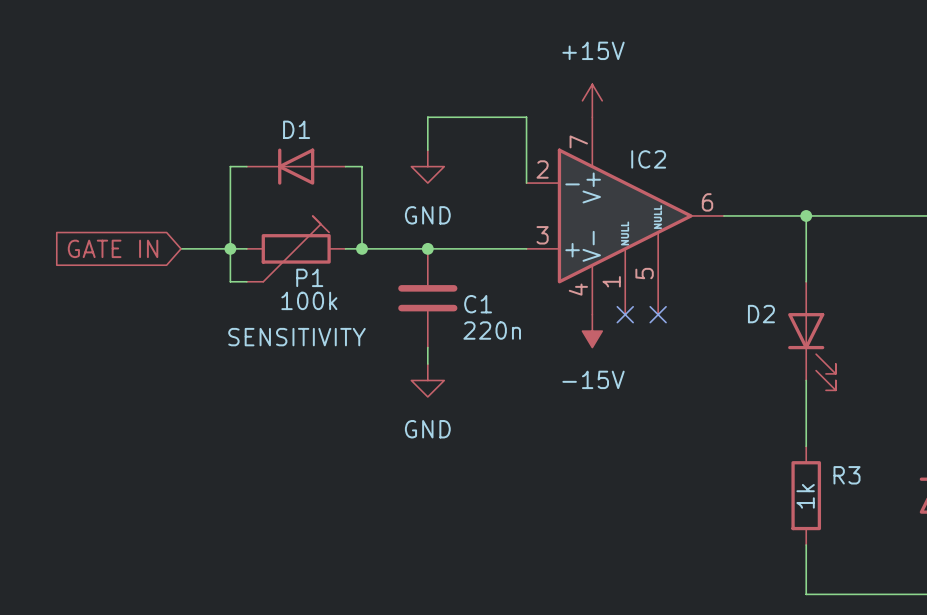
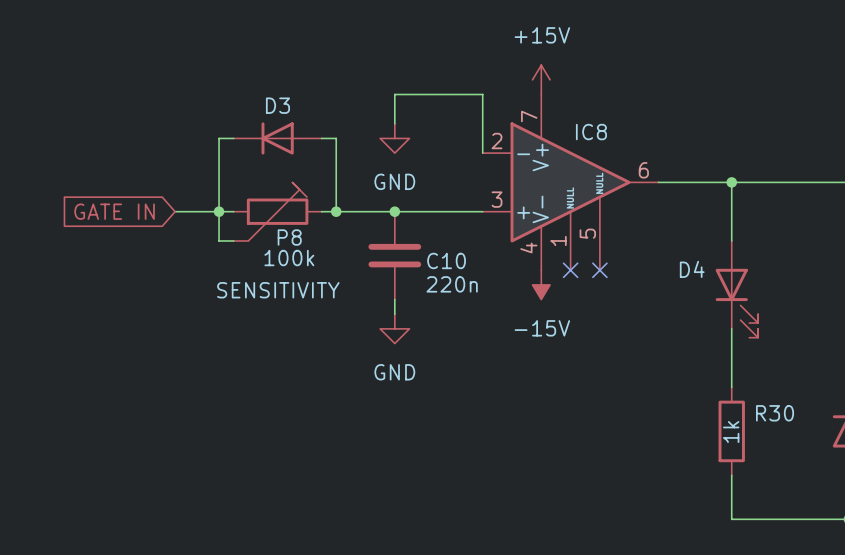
D1 name: D1 (296, 129) -> D3 (277, 105)
IC2 name: IC2 (648, 159) -> IC8 (591, 132)
P1 name: P1 (309, 277) -> P8 (289, 237)
C1 name: C1 (478, 304) -> C10 (446, 260)
D2 name: D2 (761, 314) -> D4 (692, 269)
R3 name: R3 (847, 475) -> R30 (775, 413)

